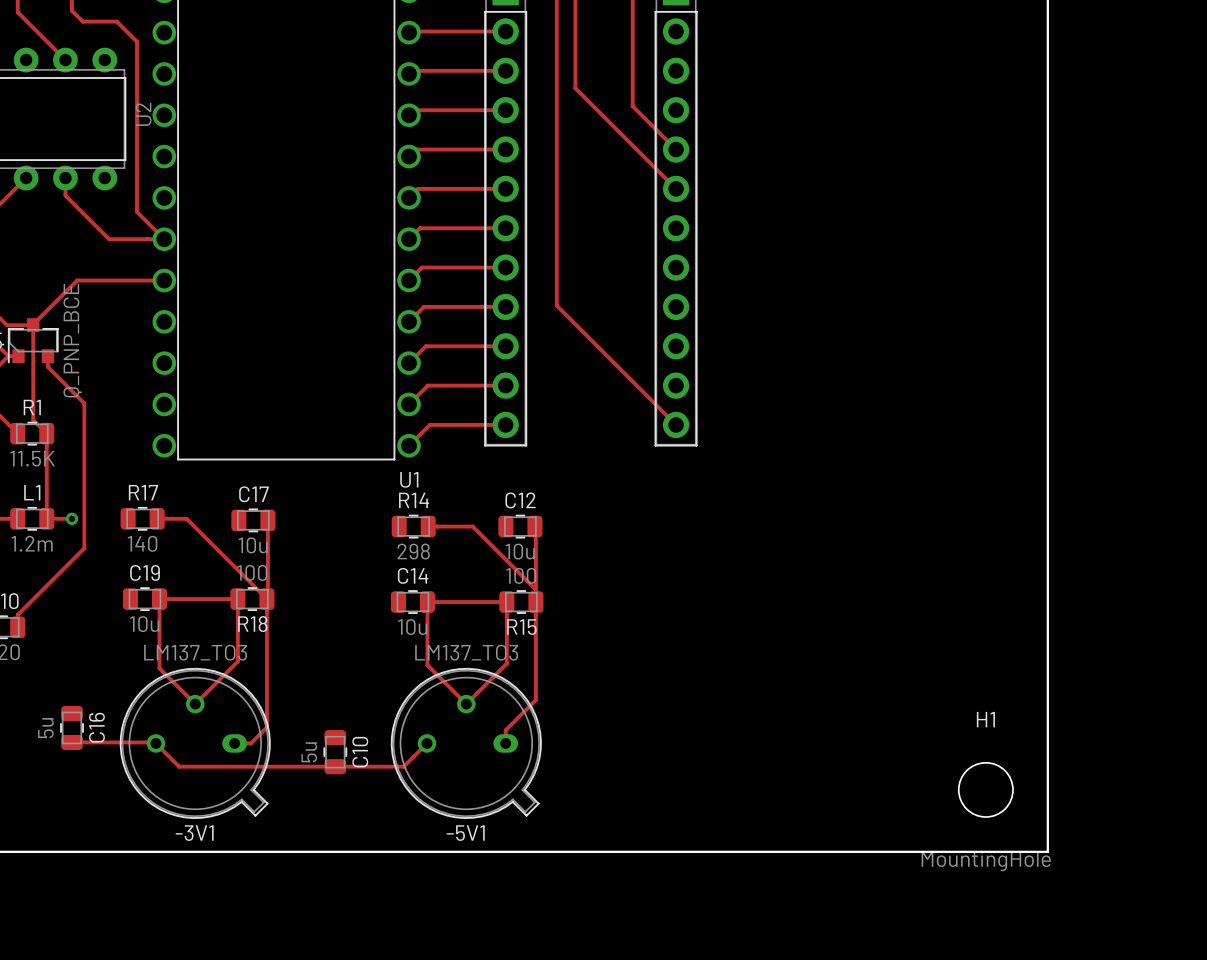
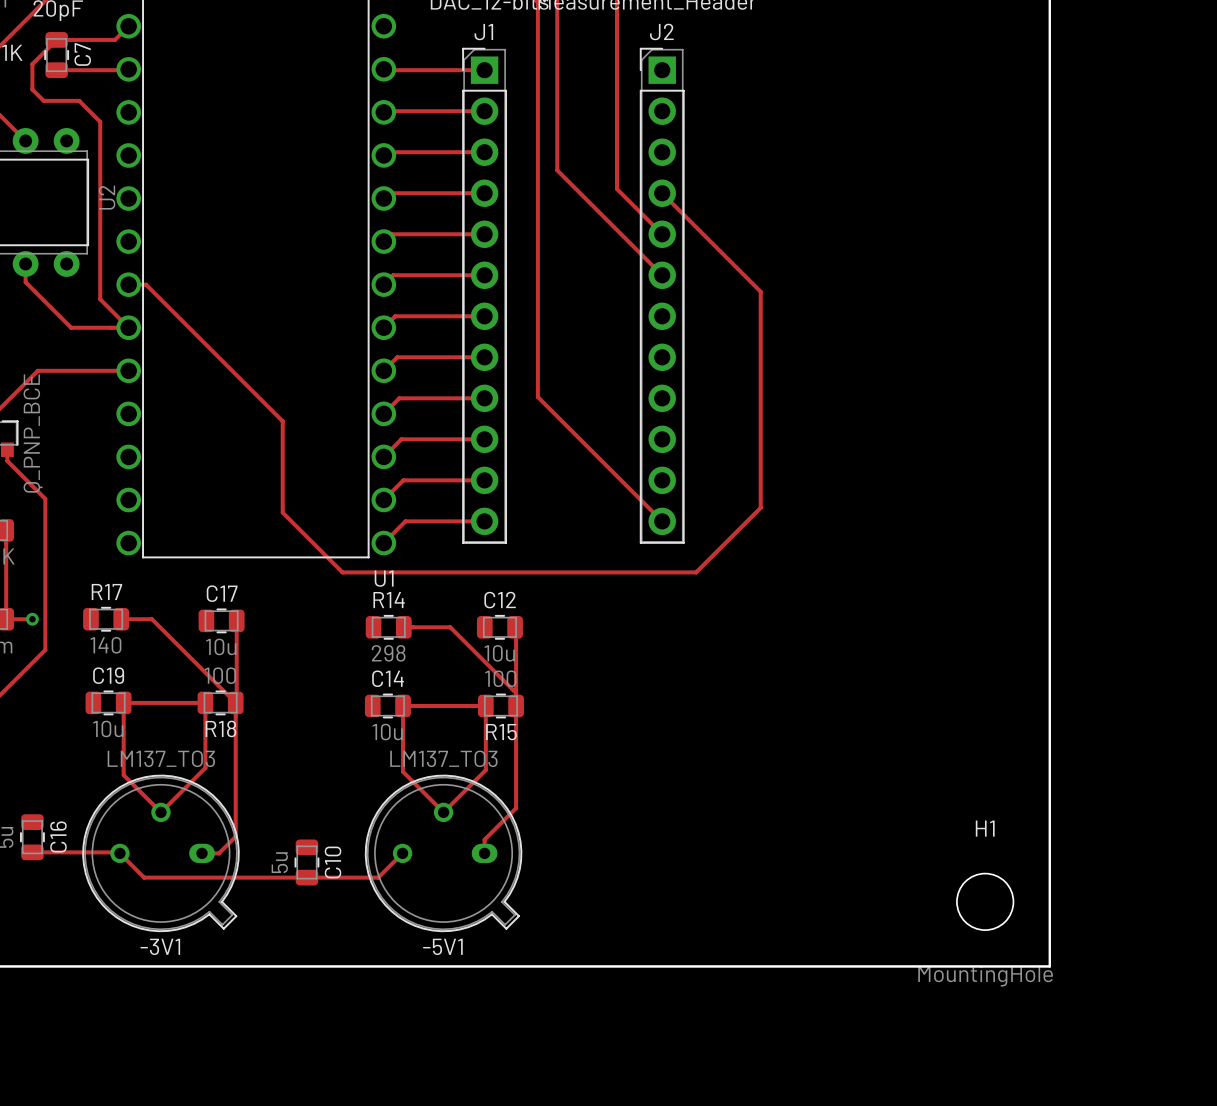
track: none -> (662, 193) (760, 291) (760, 507) (696, 572) (342, 572) (282, 512) (282, 421) (146, 284) (128, 284)

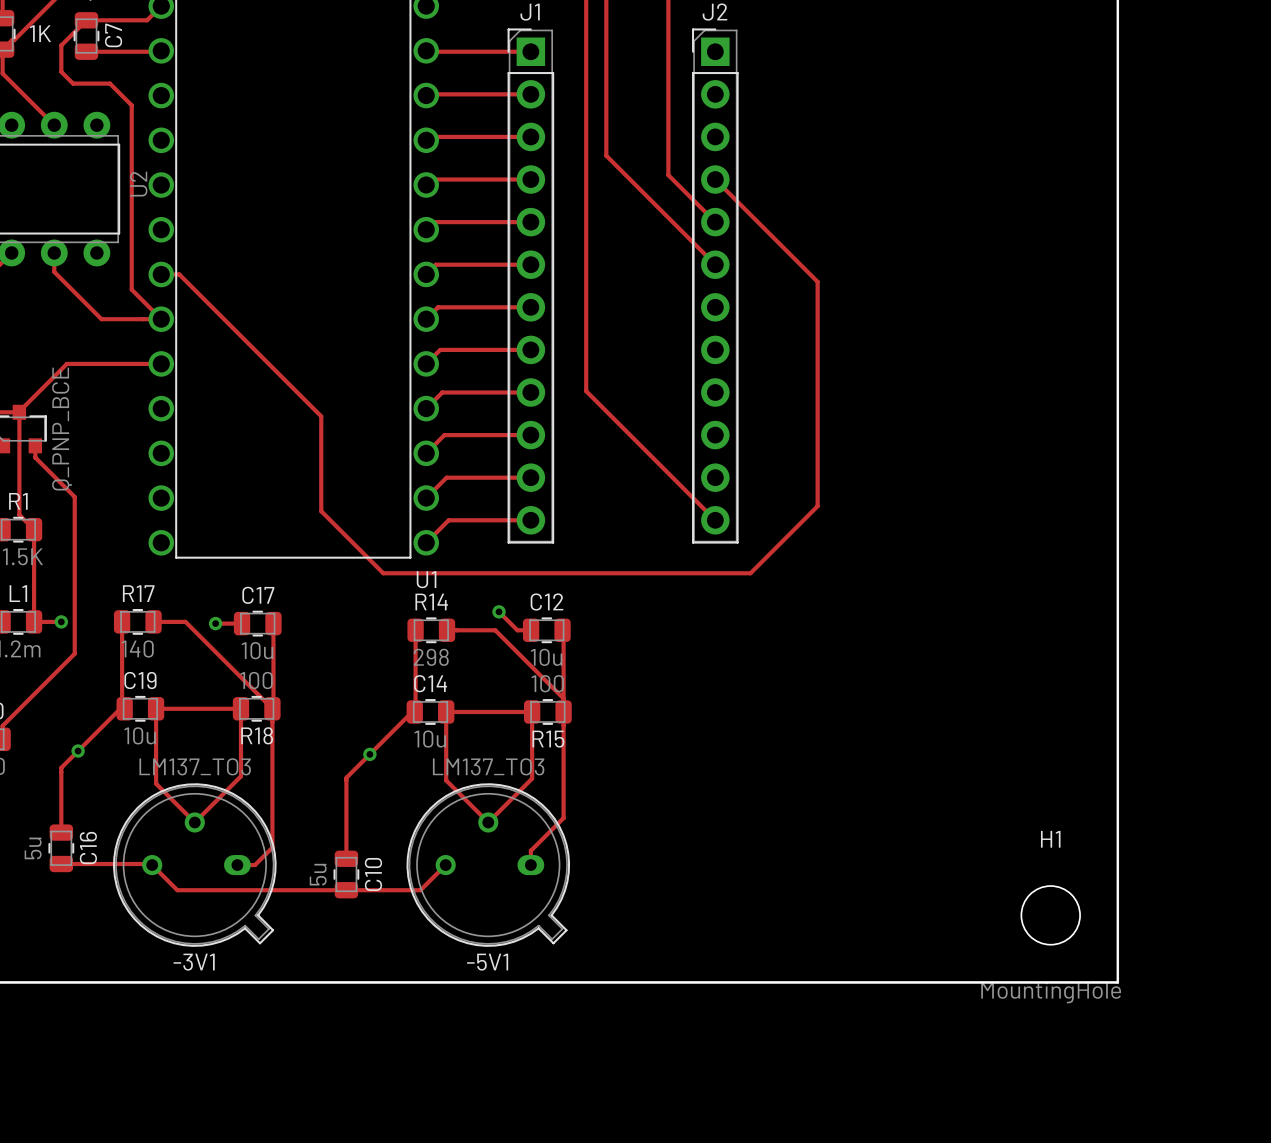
track: none -> (499, 611) (517, 630) (531, 630)
via: none -> (499, 611)
track: none -> (122, 621) (122, 706) (124, 708) (120, 708) (61, 767) (61, 832)
via: none -> (215, 623)
track: none -> (215, 623) (242, 623)
track: none -> (415, 630) (415, 711) (412, 711) (346, 777) (346, 858)
via: none -> (78, 751)
via: none -> (369, 754)

